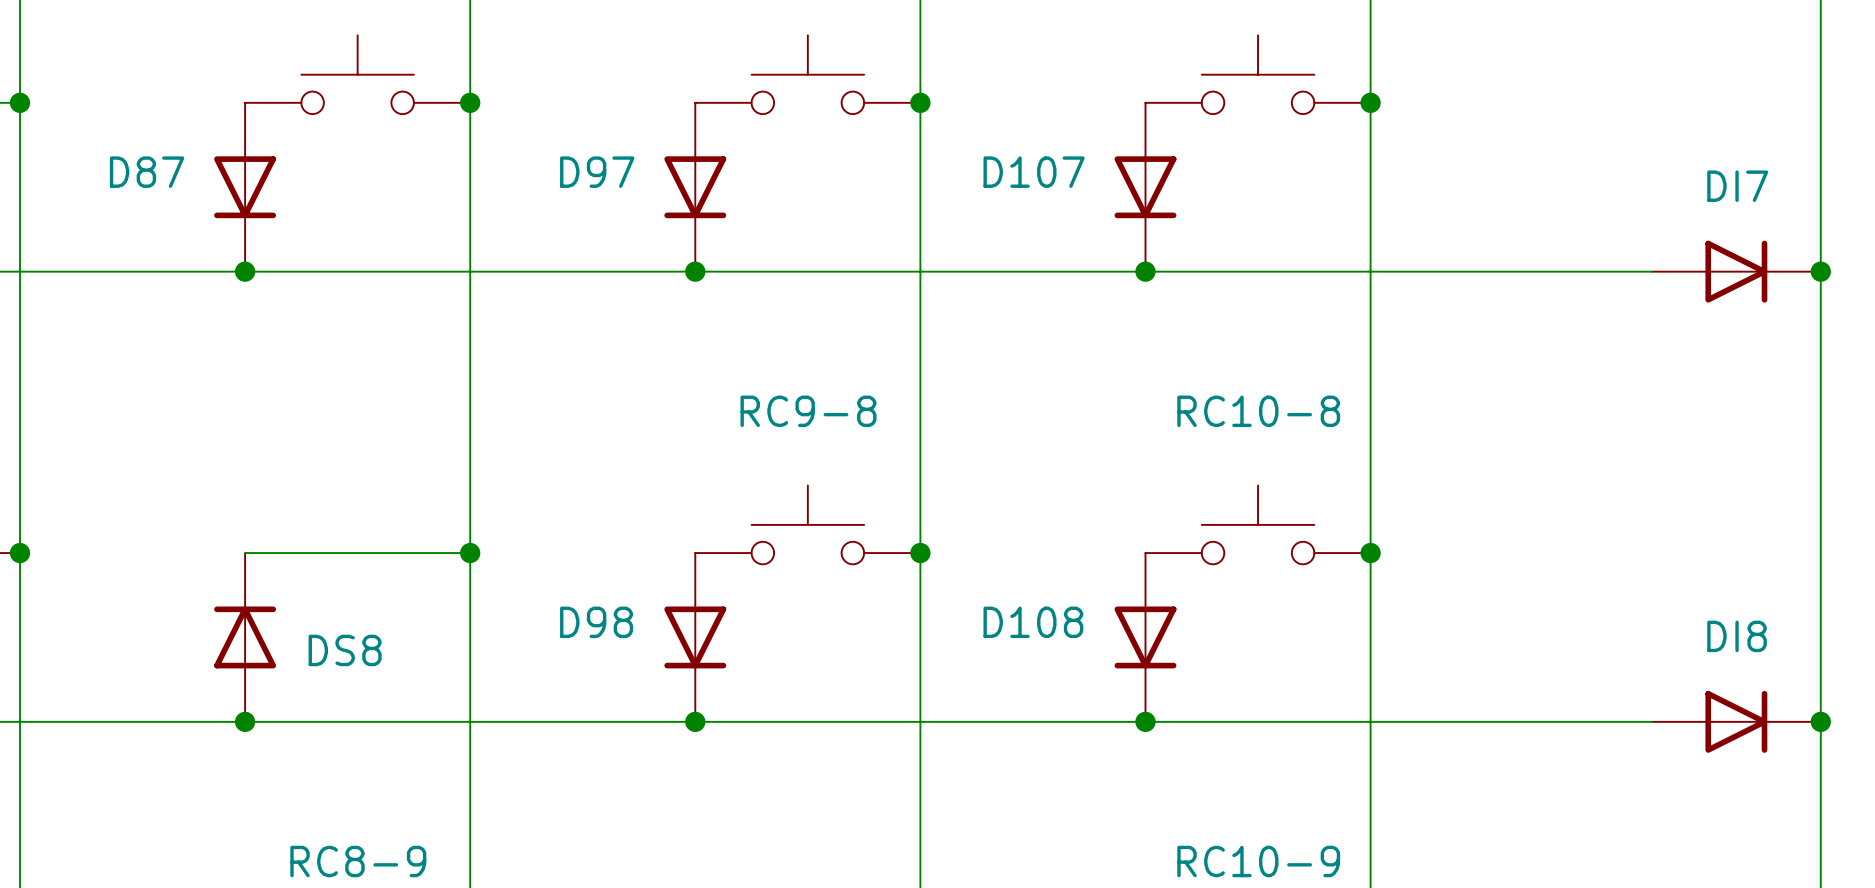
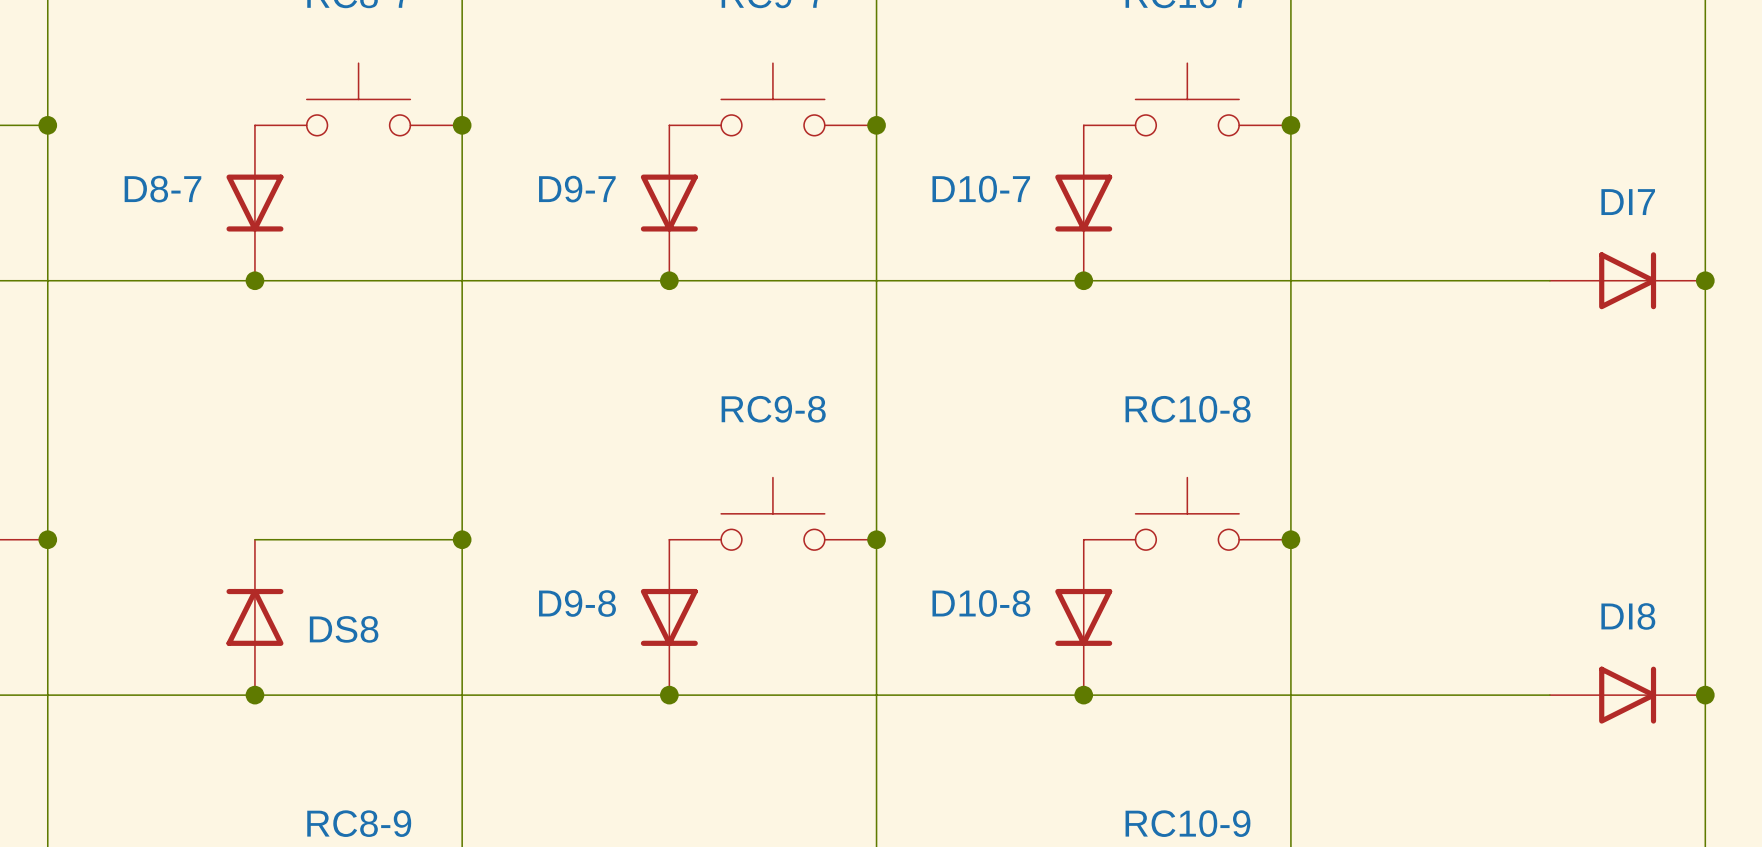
D87 name: D87 (147, 172) -> D8-7 (162, 189)
D97 name: D97 (597, 172) -> D9-7 (577, 189)
D107 name: D107 (1034, 172) -> D10-7 (981, 189)
D98 name: D98 (596, 622) -> D9-8 (577, 603)
D108 name: D108 (1033, 622) -> D10-8 (981, 603)

